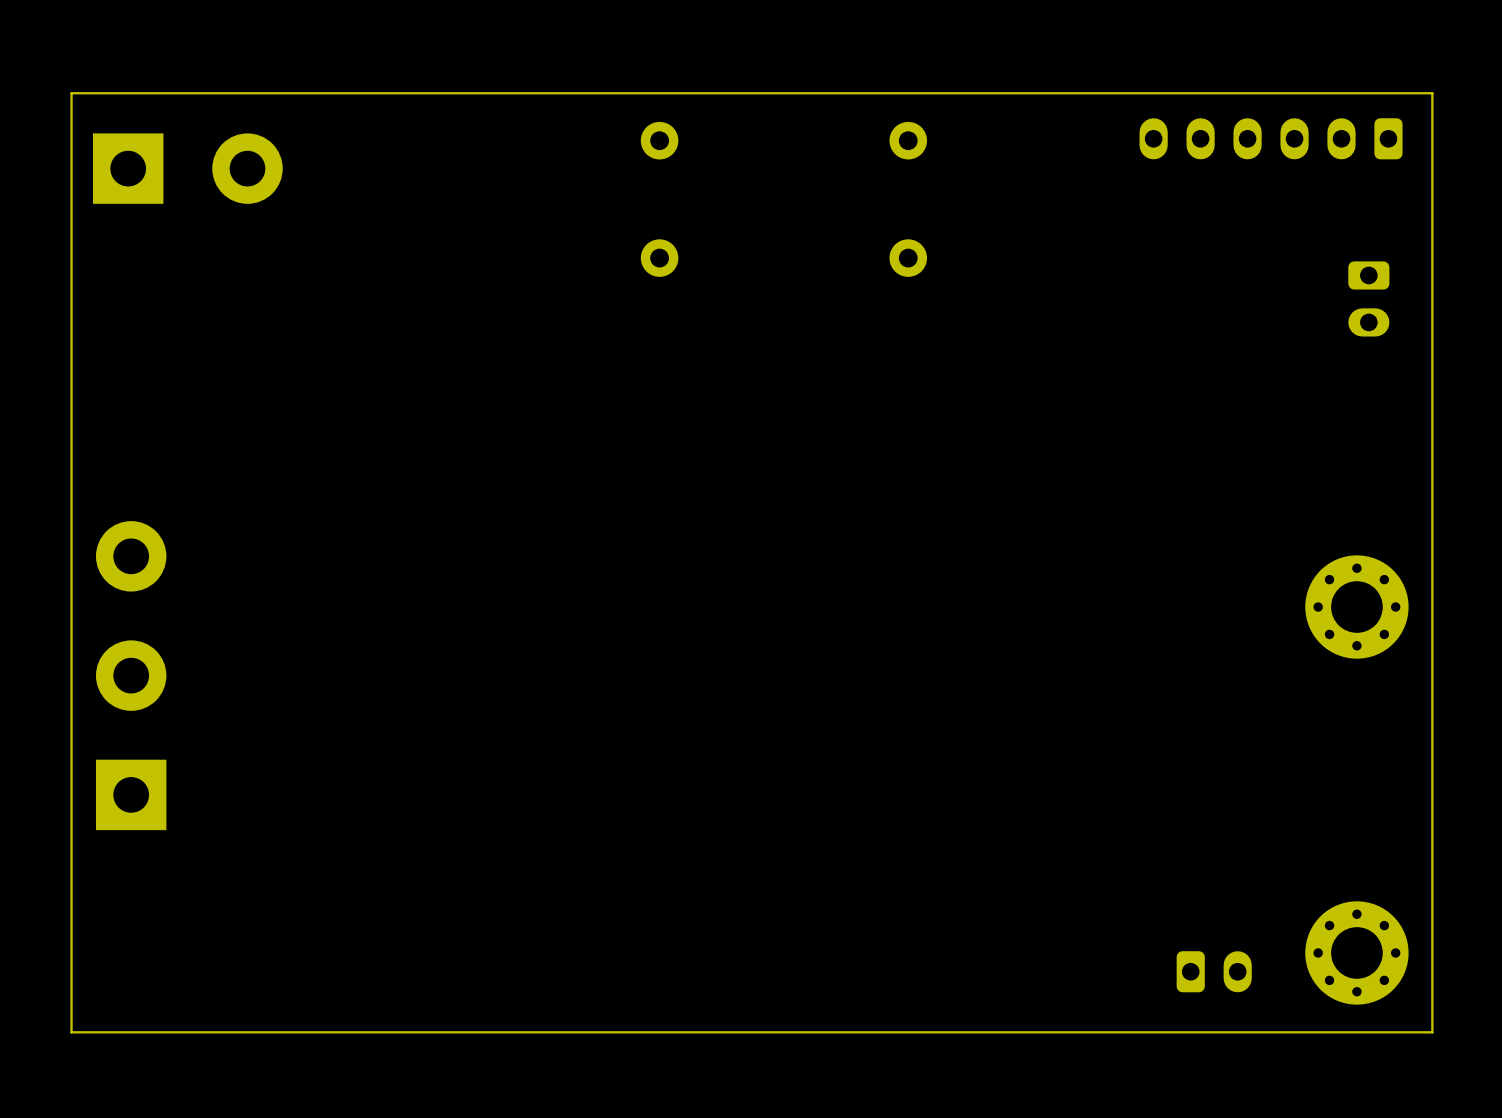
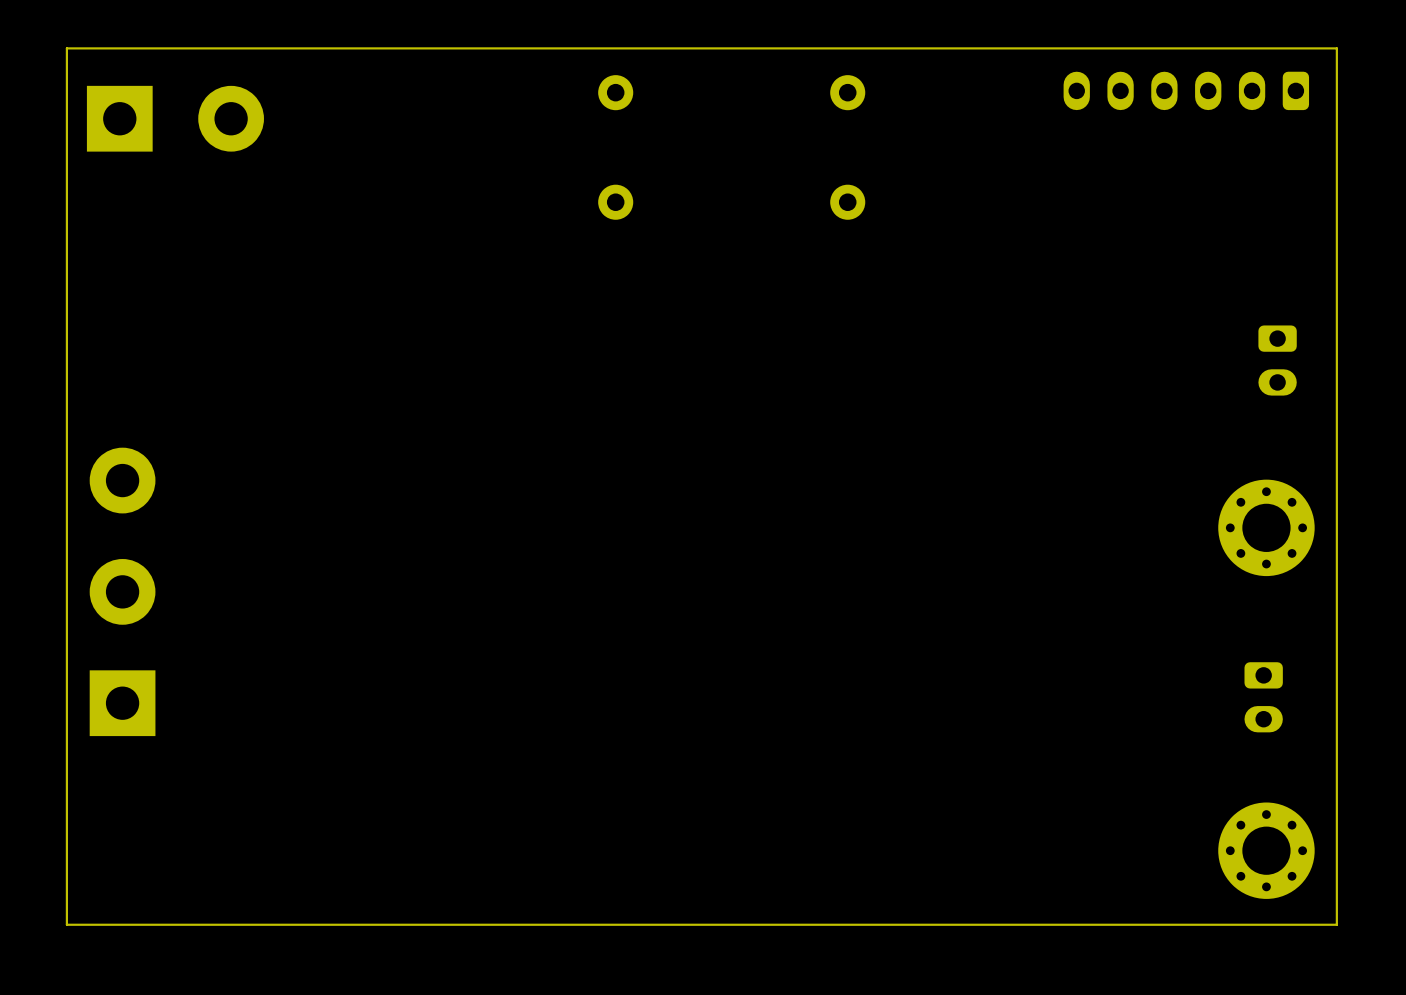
part position: (1368, 298) -> (1277, 360)
part rotation: 0° (1214, 971) -> 90° clockwise (1263, 697)
part position: (1214, 971) -> (1263, 697)

